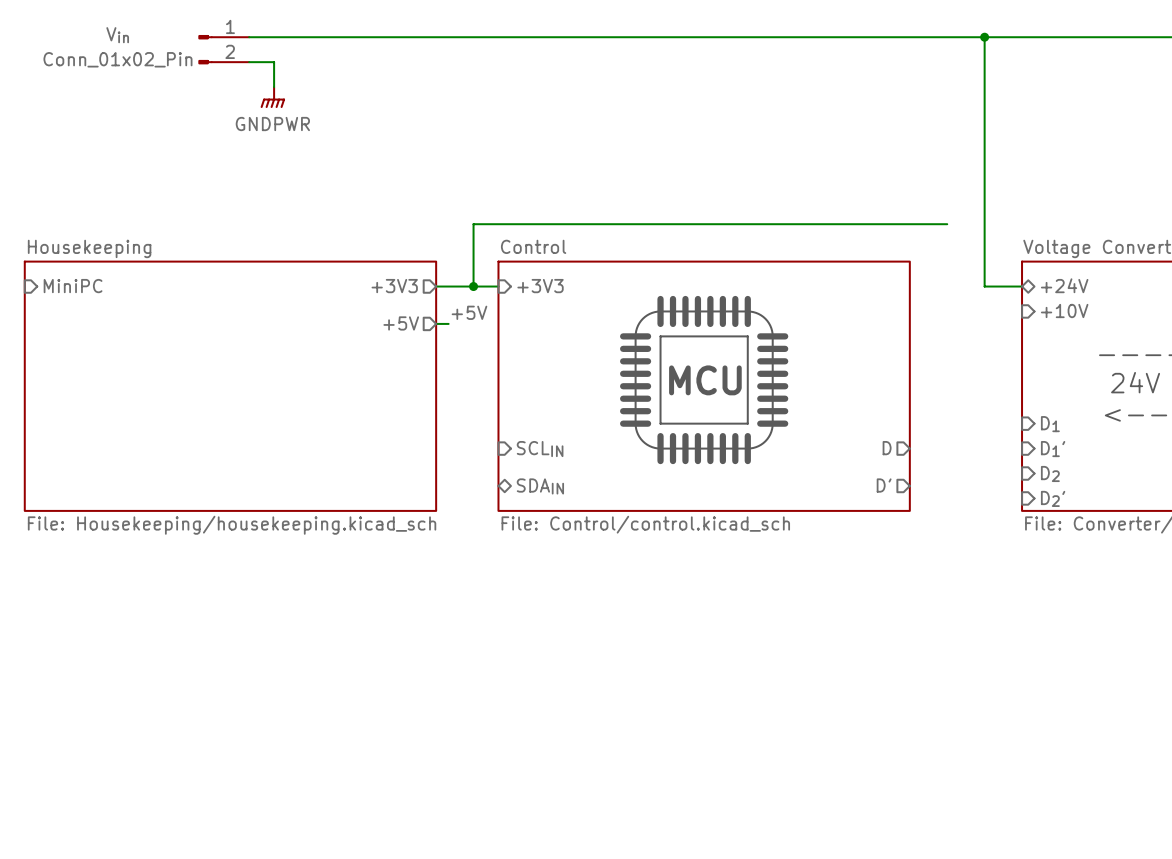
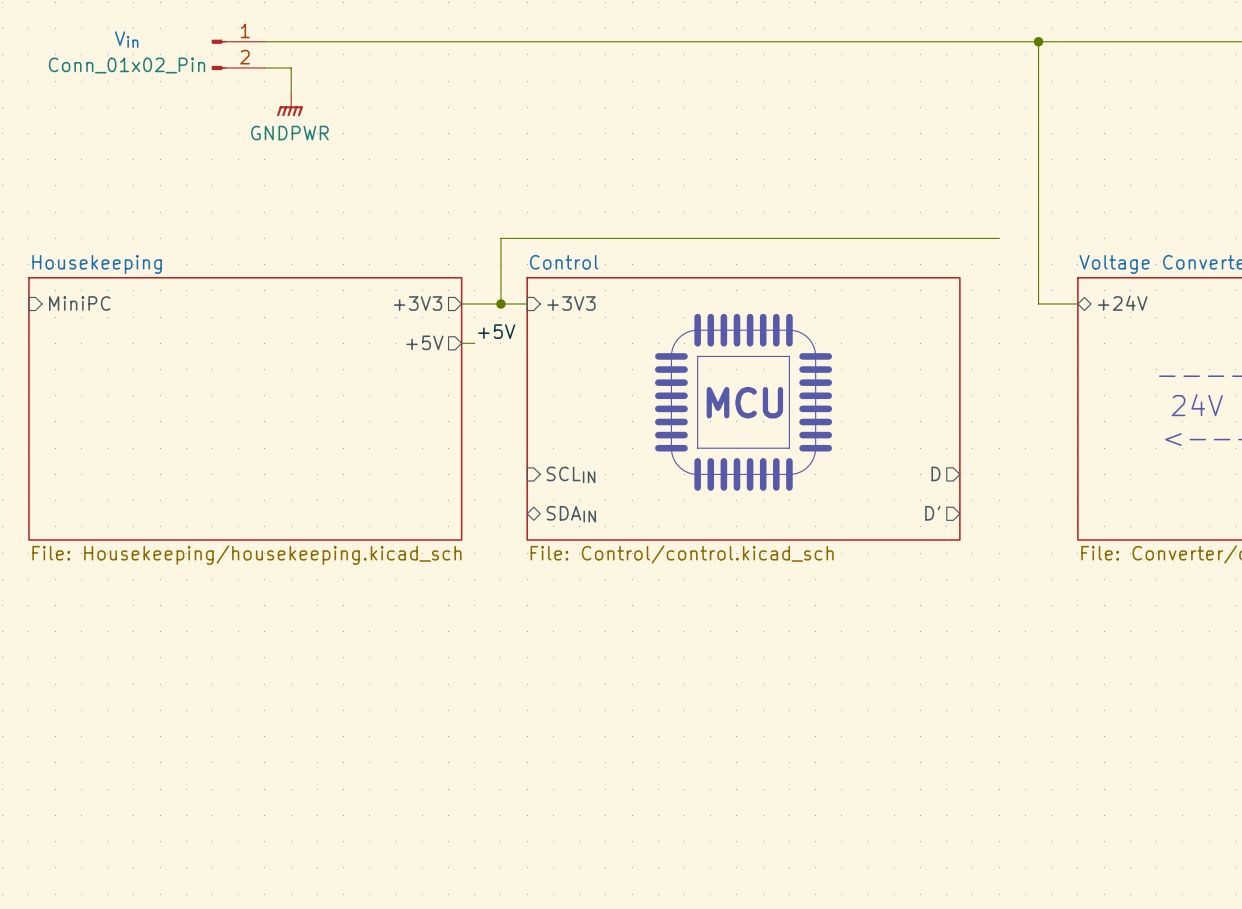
sheet pin: +10V (1064, 310) -> none
sheet pin: D1 (1050, 424) -> none
sheet pin: D1' (1053, 449) -> none
sheet pin: D2 (1050, 473) -> none
sheet pin: D2' (1053, 498) -> none

